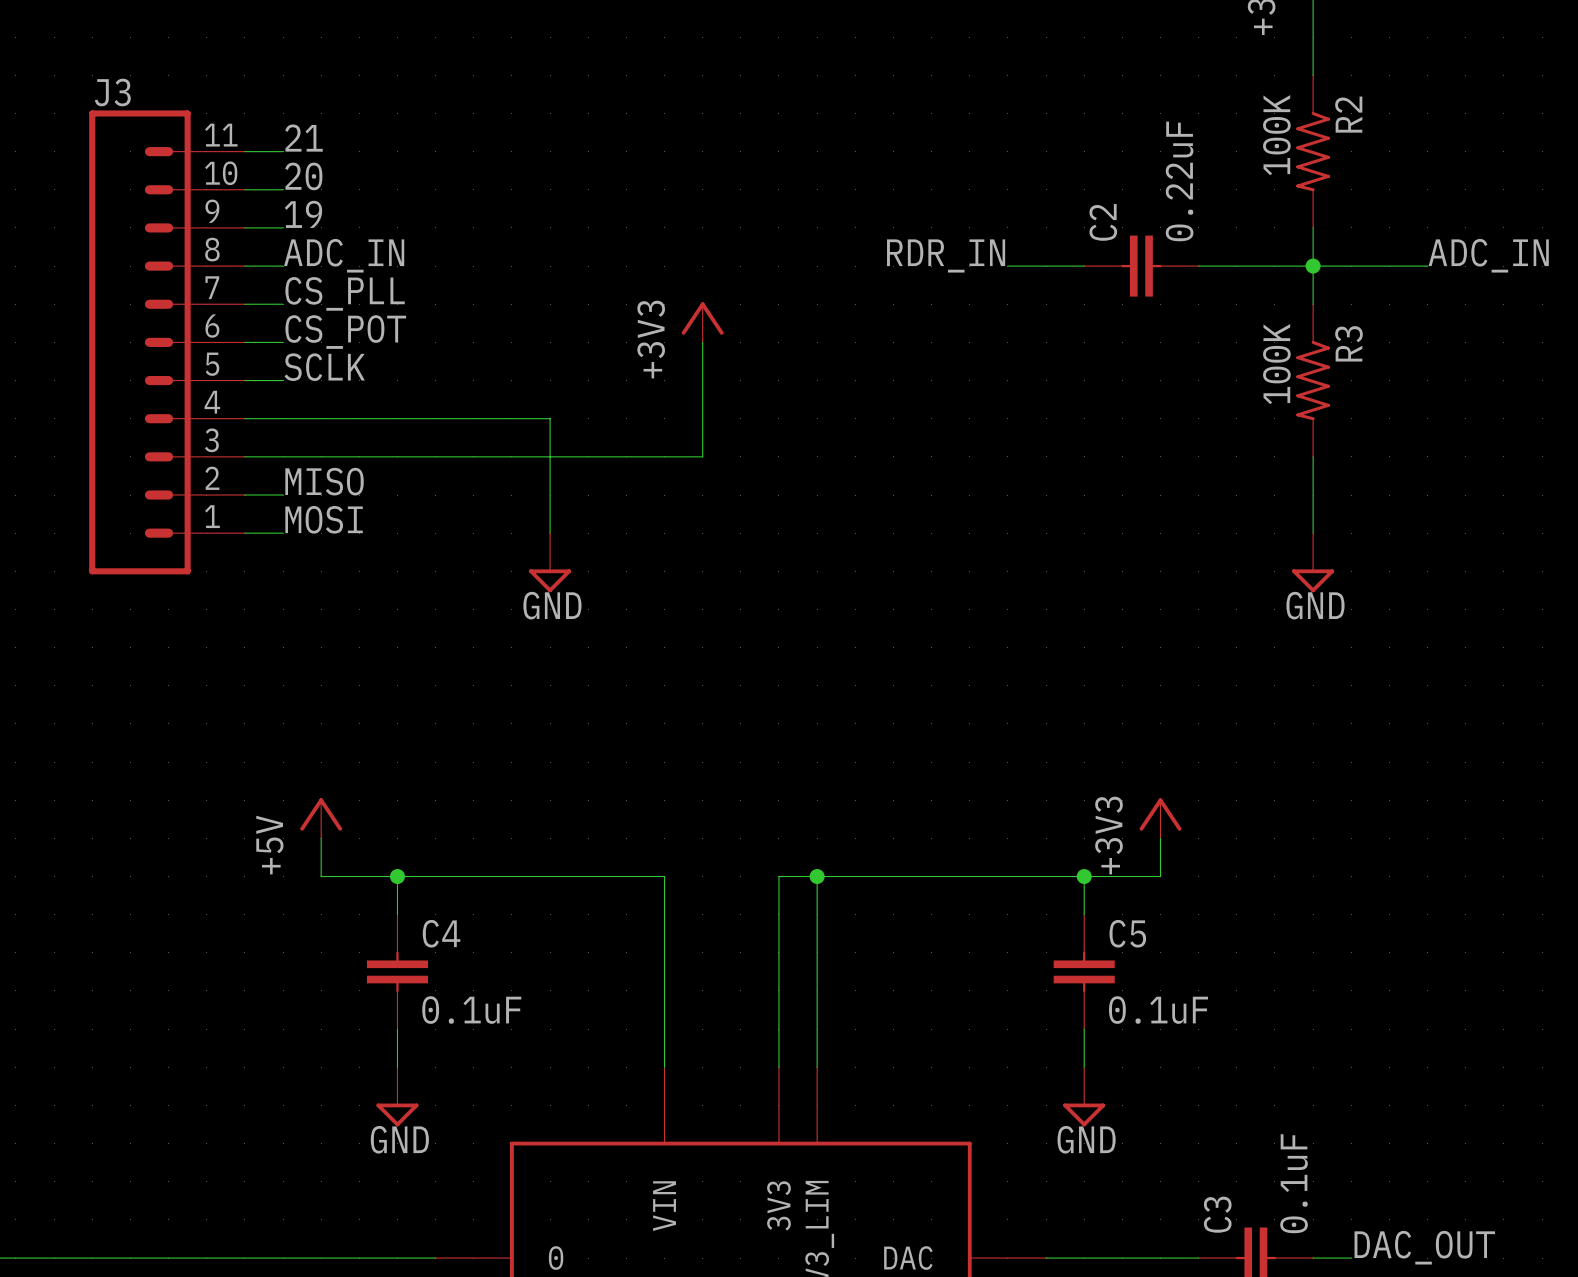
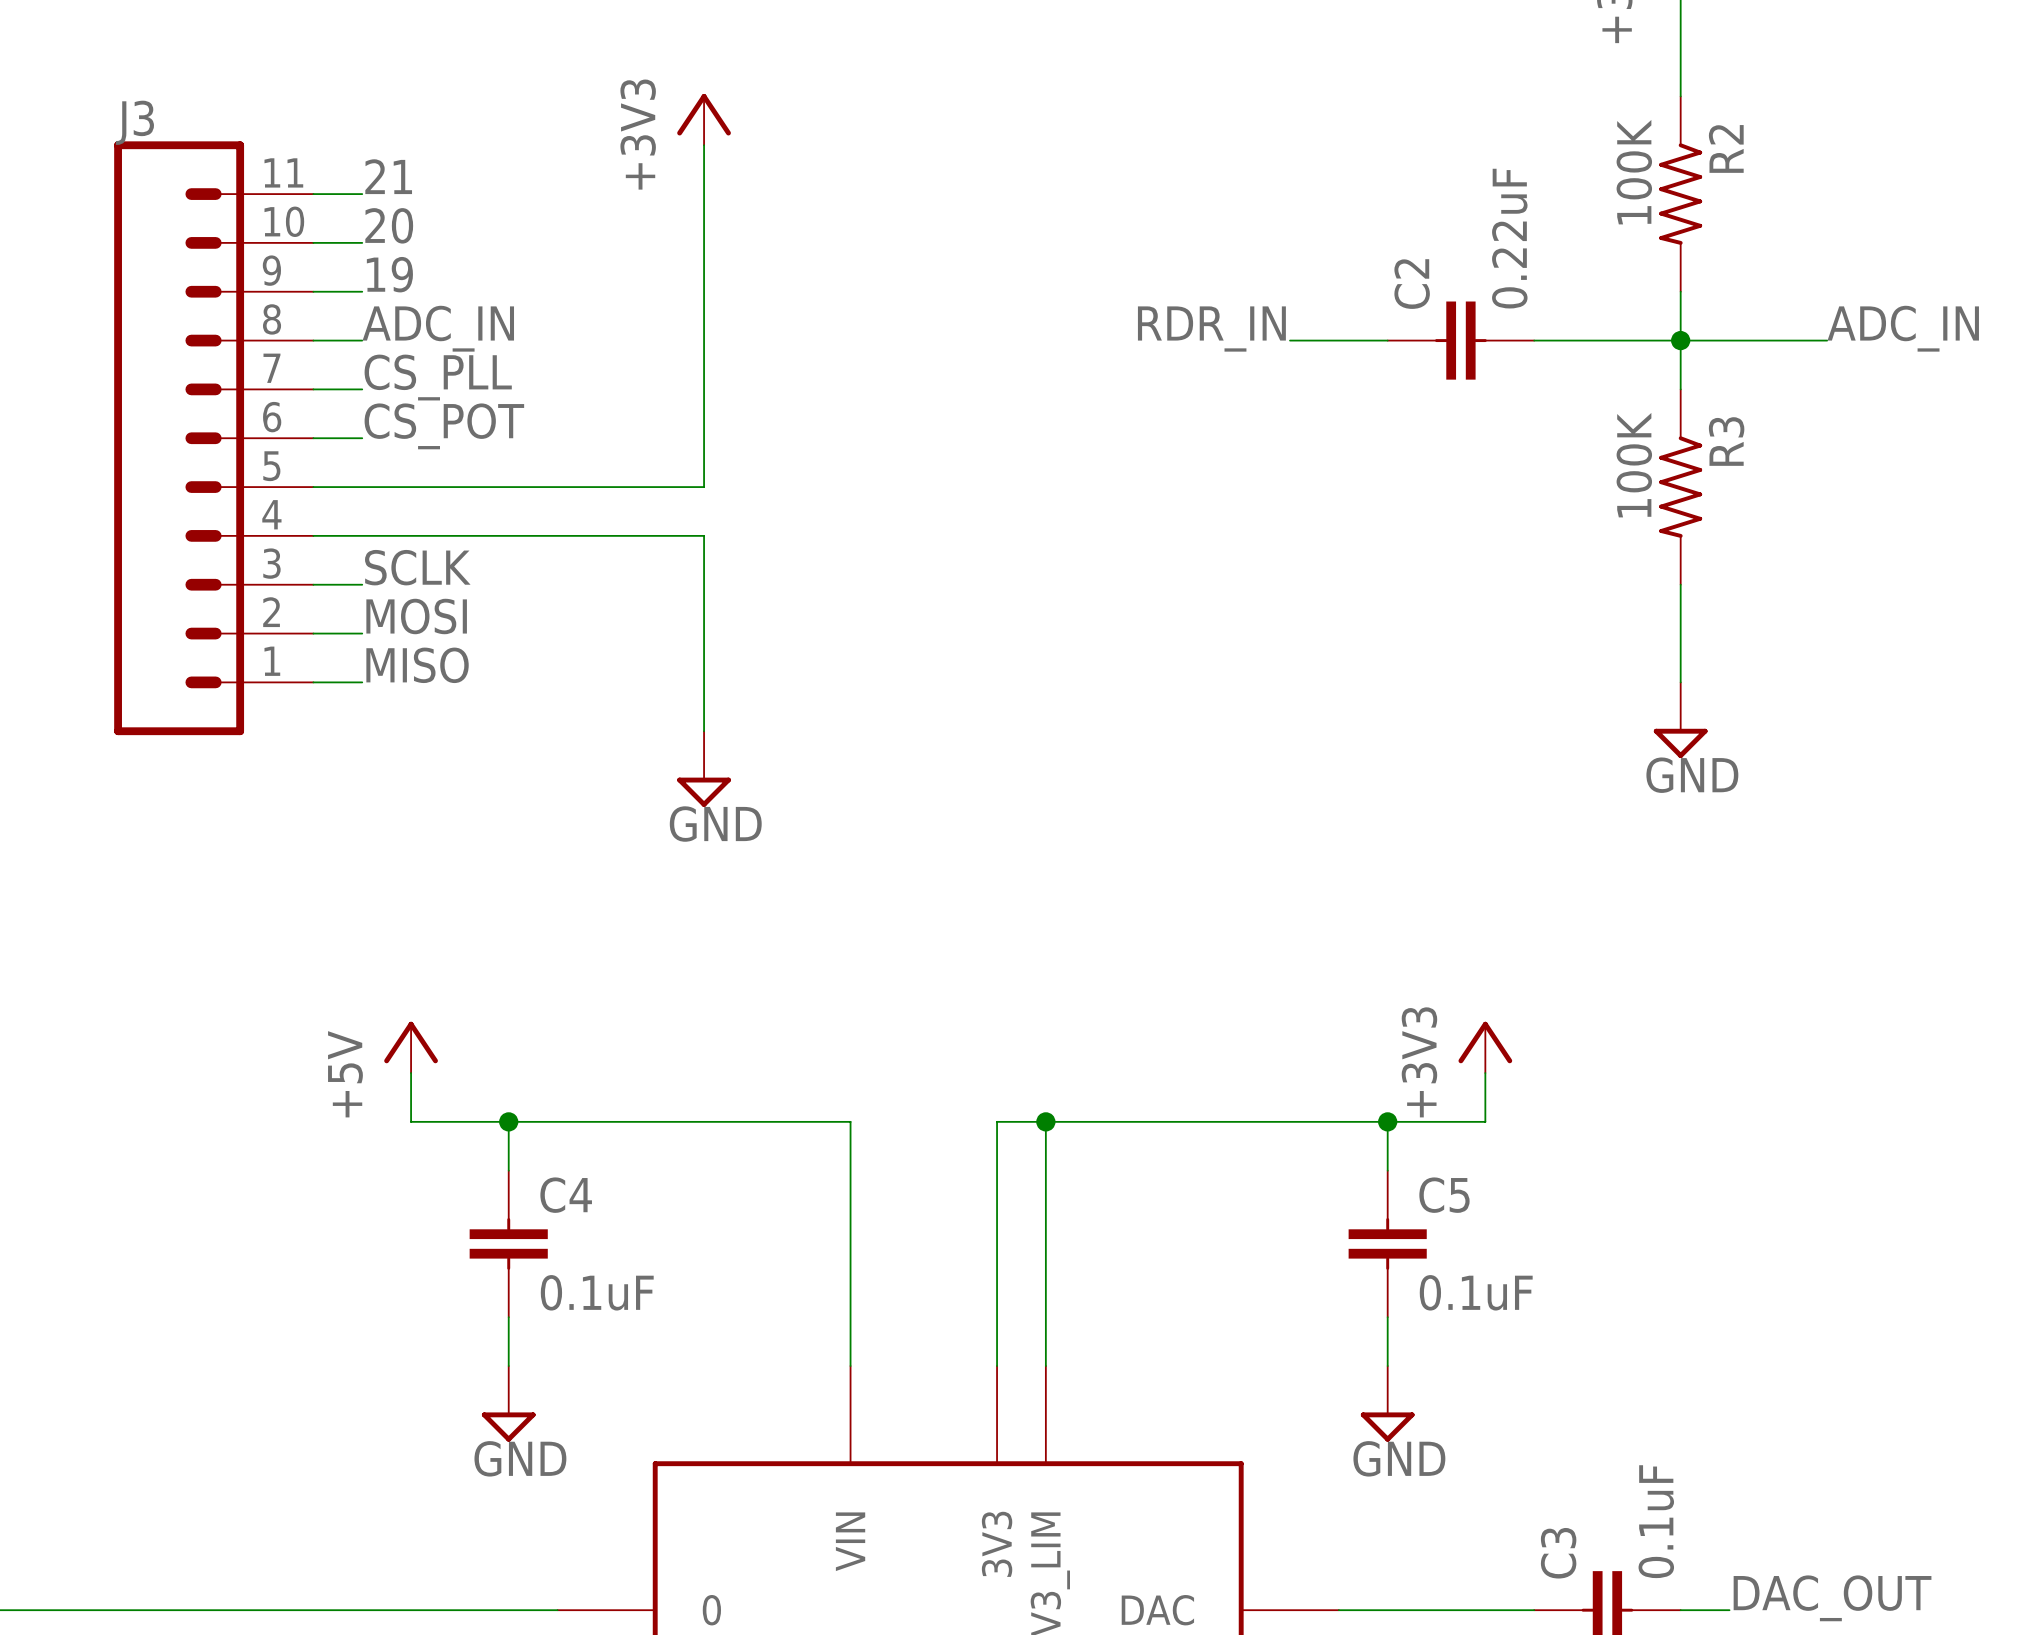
wire: none -> (704, 145) (704, 487) (362, 487)
power symbol position: +3V3 (702, 322) -> +3V3 (704, 119)
wire: (702, 342) (702, 456) (283, 456) -> none
label position: SCLK (324, 367) -> SCLK (417, 567)
label: MISO (324, 481) -> MOSI (416, 616)
label: MOSI (324, 519) -> MISO (417, 665)
power symbol position: GND (550, 562) -> GND (704, 769)

